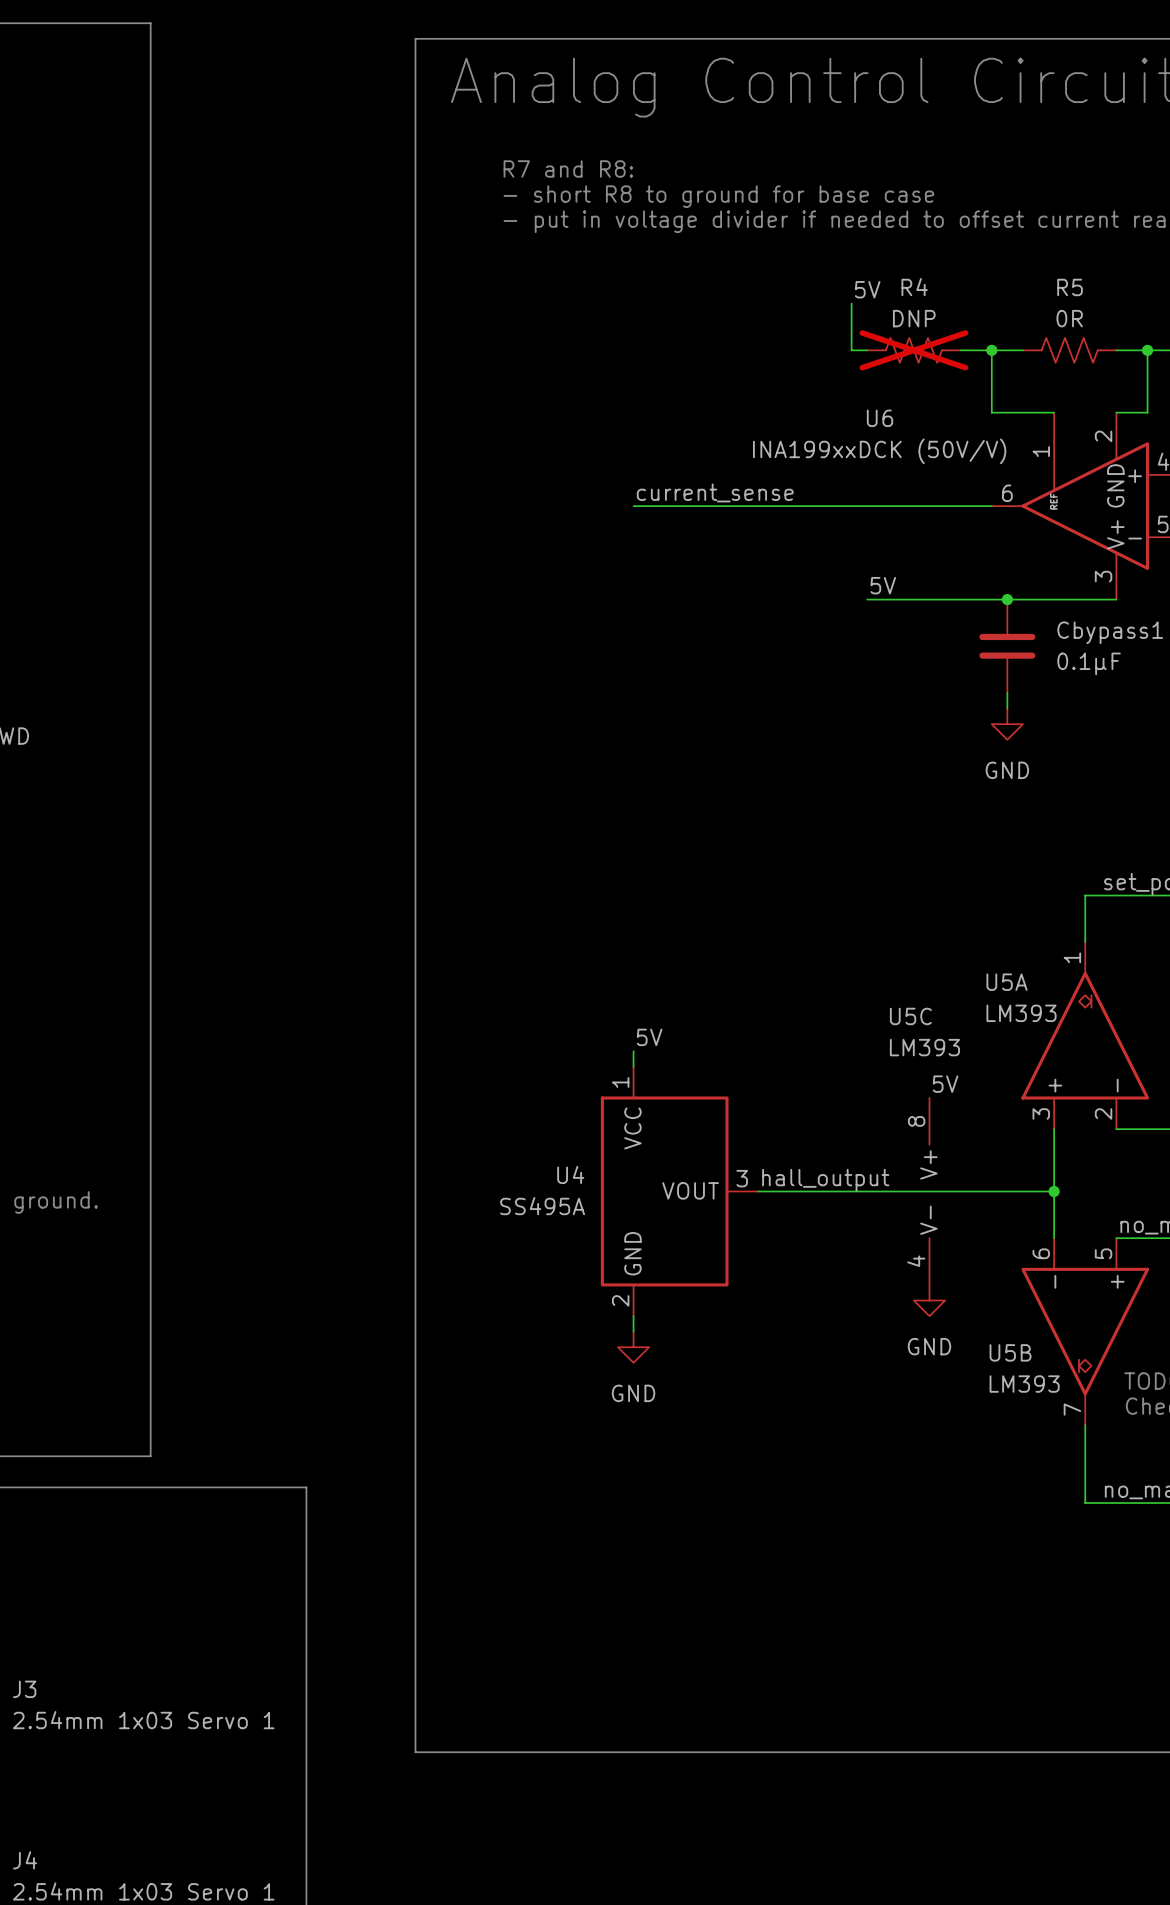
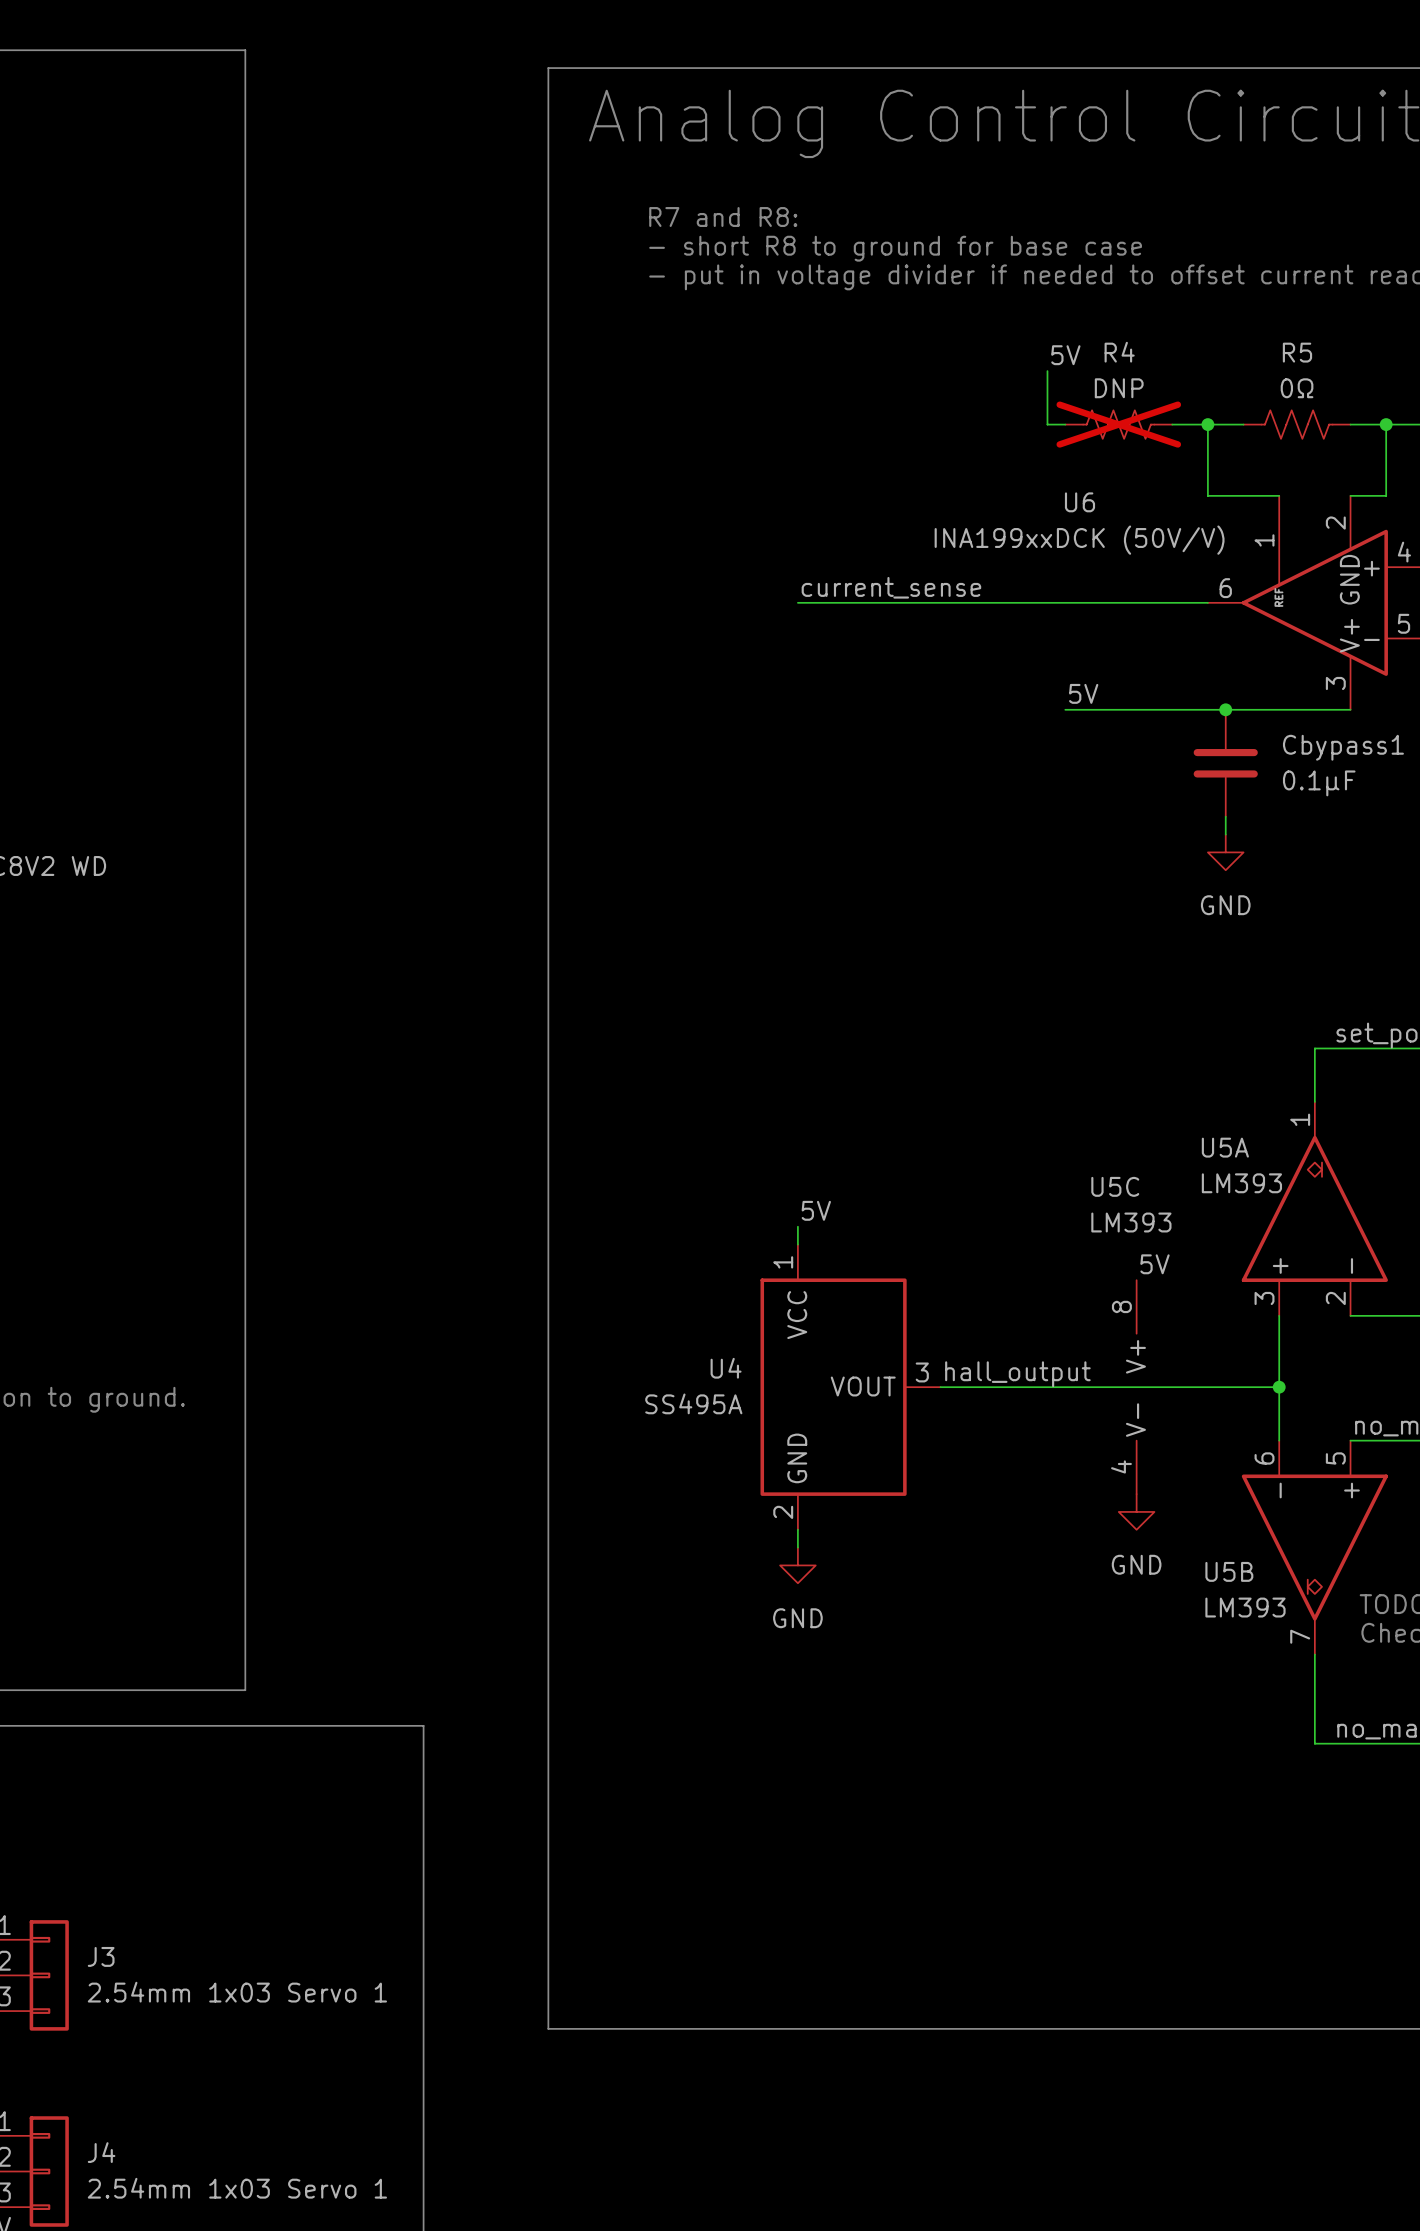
R5 value: 0R (1069, 318) -> 0Ω (1297, 388)

